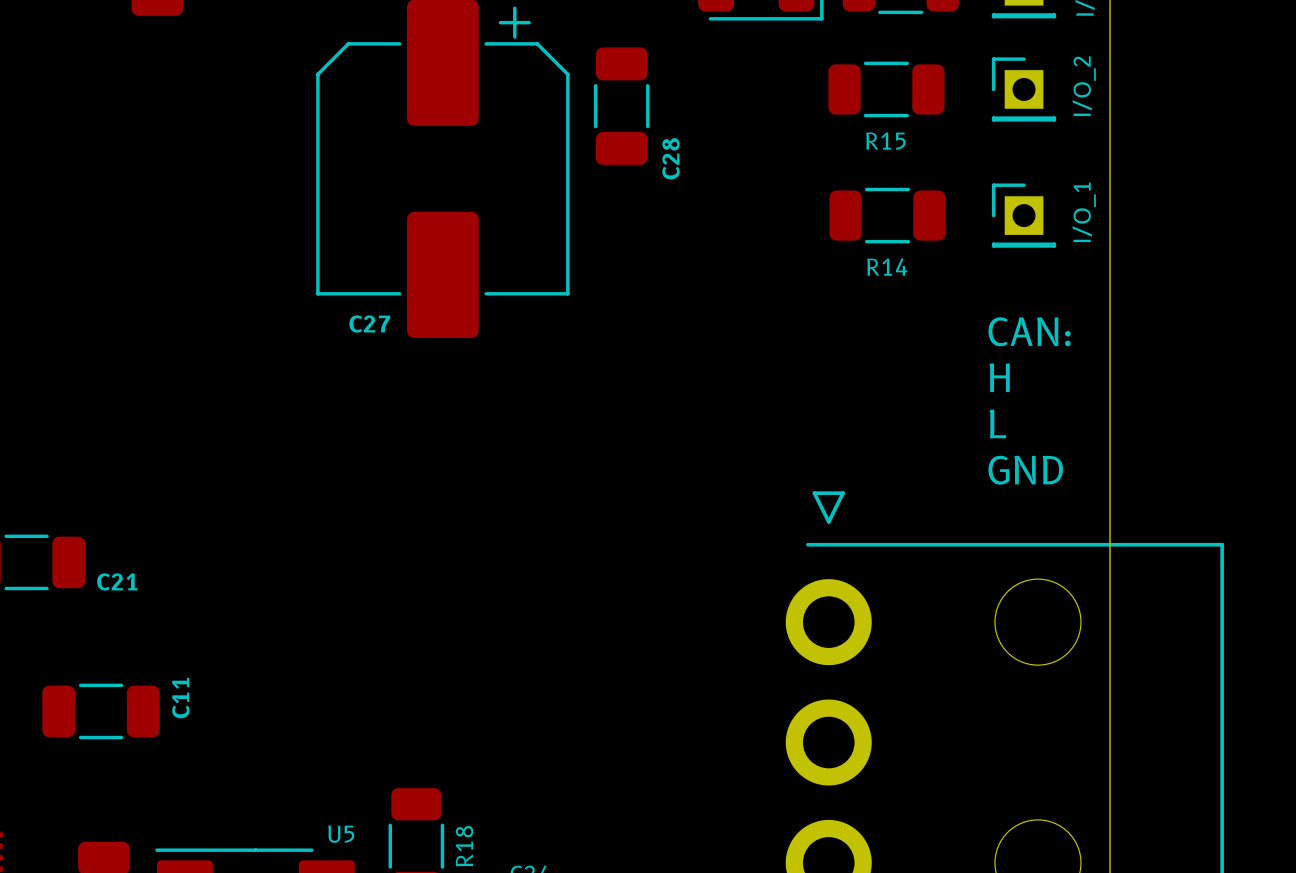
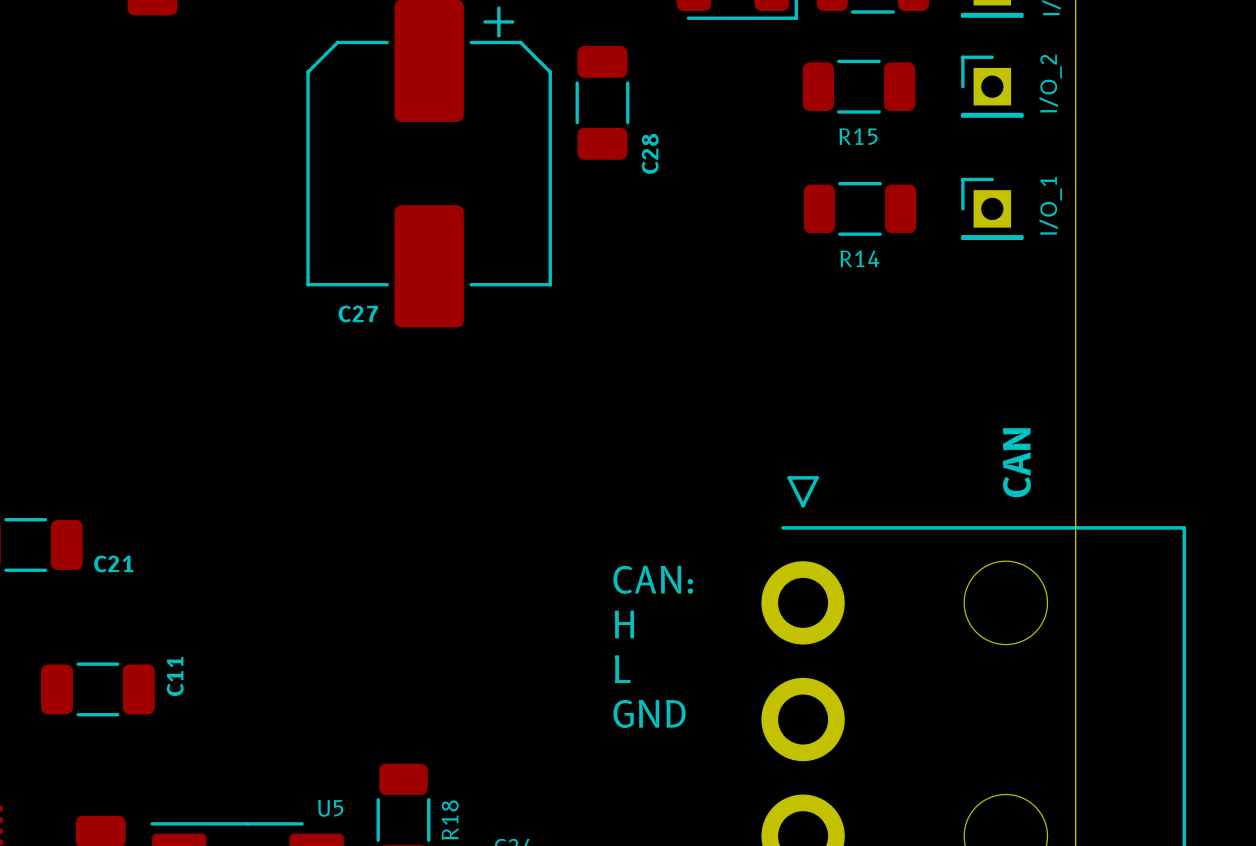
text position: CAN: (1029, 331) -> CAN: (653, 579)
text position: H (999, 377) -> H (624, 624)
text position: L (998, 423) -> L (622, 669)
text position: GND (1025, 470) -> GND (649, 713)
text: none -> CAN (1016, 462)

